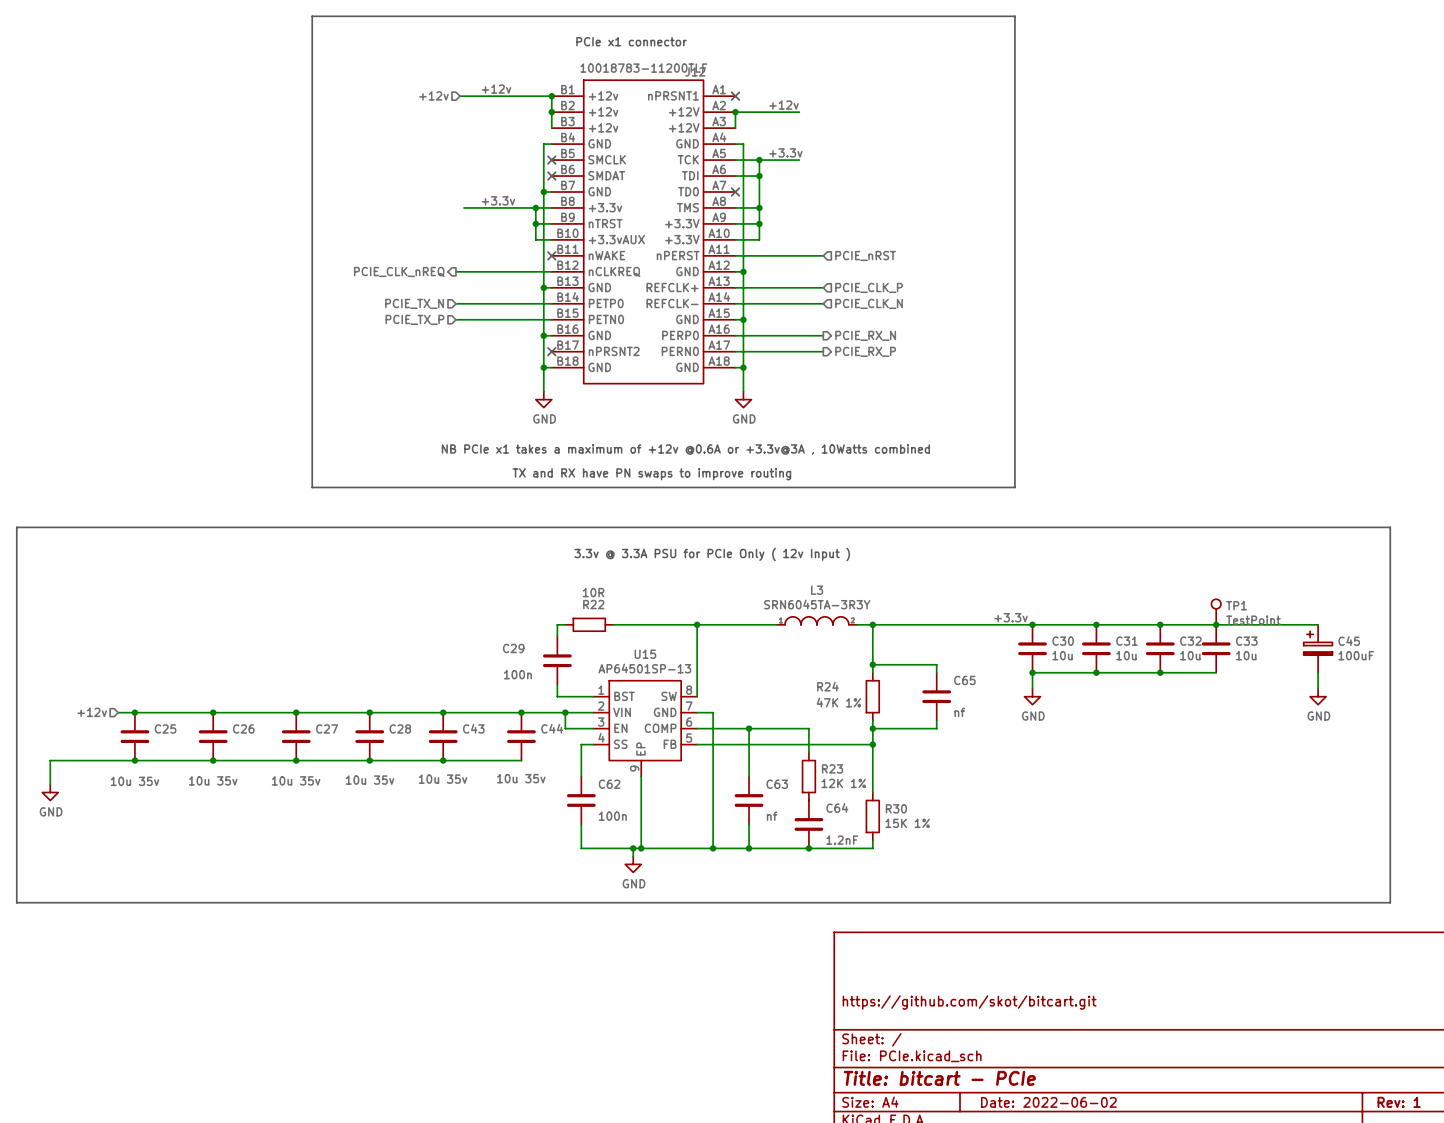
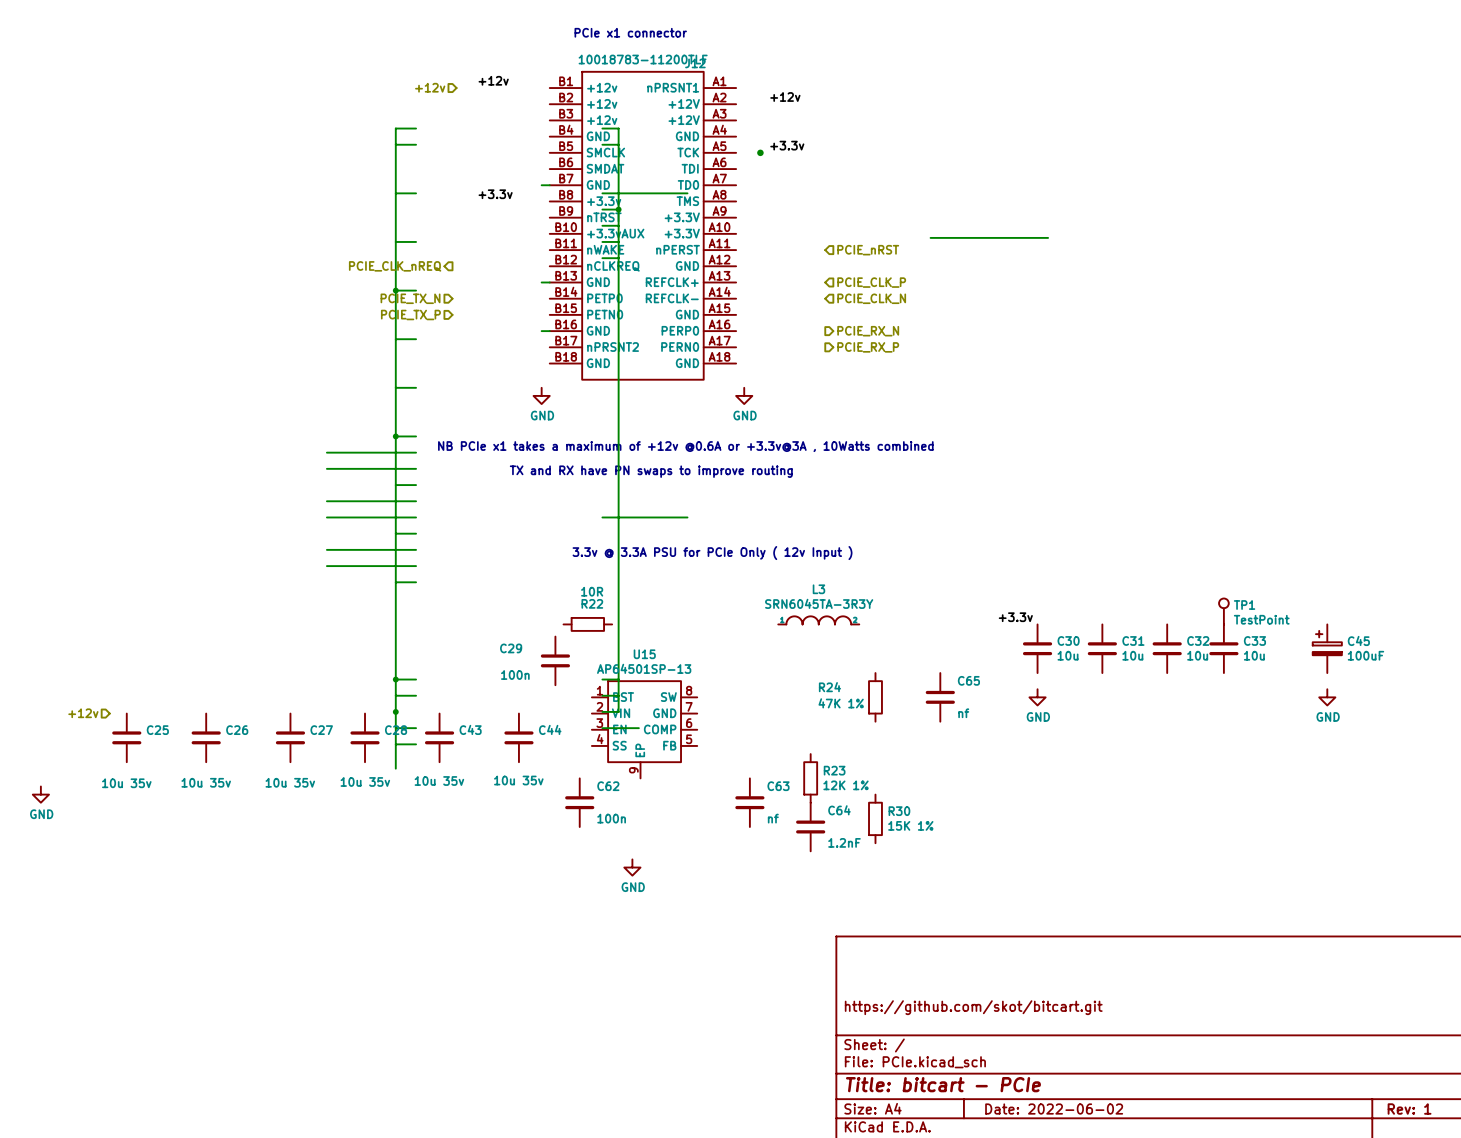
line: (312, 16) (312, 487) (1014, 487) (1014, 16) (312, 16) -> none
wire: (459, 96) (551, 96) (551, 128) -> none
junction: (551, 96) -> none
no-connect mark: (735, 96) -> none
junction: (551, 112) -> none
junction: (735, 112) -> none
wire: (799, 112) (735, 112) (735, 128) -> none
wire: none -> (416, 128) (395, 128) (395, 768)
wire: none -> (602, 128) (618, 128) (618, 711) (602, 711)
wire: (551, 144) (543, 144) (543, 391) -> none
wire: (735, 144) (743, 144) (743, 391) -> none
wire: none -> (395, 144) (416, 144)
wire: none -> (602, 144) (618, 144)
no-connect mark: (551, 160) -> none
wire: (735, 160) (799, 160) -> none
wire: (759, 160) (759, 239) (735, 239) -> none
no-connect mark: (551, 176) -> none
wire: (735, 176) (759, 176) -> none
junction: (759, 176) -> none
junction: (543, 192) -> none
no-connect mark: (735, 192) -> none
wire: none -> (395, 193) (416, 193)
wire: none -> (602, 193) (687, 193)
wire: (463, 207) (551, 207) -> none
wire: (535, 207) (535, 239) (551, 239) -> none
junction: (535, 207) -> none
wire: (735, 207) (759, 207) -> none
junction: (759, 207) -> none
junction: none -> (618, 209)
wire: (535, 223) (551, 223) -> (602, 209) (618, 209)
junction: (535, 223) -> none
wire: (735, 223) (759, 223) -> none
junction: (759, 223) -> none
wire: none -> (602, 225) (618, 225)
wire: none -> (930, 237) (1048, 237)
wire: none -> (395, 241) (416, 241)
wire: none -> (602, 241) (618, 241)
no-connect mark: (551, 255) -> none
wire: (735, 255) (823, 255) -> none
wire: none -> (602, 258) (618, 258)
wire: (455, 271) (551, 271) -> none
wire: (735, 271) (743, 271) -> none
junction: (743, 271) -> none
junction: (543, 287) -> none
wire: (735, 287) (823, 287) -> none
wire: none -> (395, 290) (416, 290)
junction: none -> (395, 290)
wire: (455, 303) (551, 303) -> none
wire: (735, 303) (823, 303) -> none
wire: (455, 319) (551, 319) -> none
wire: (735, 319) (743, 319) -> none
junction: (743, 319) -> none
junction: (543, 335) -> none
wire: (735, 335) (823, 335) -> none
wire: none -> (395, 339) (416, 339)
no-connect mark: (551, 351) -> none
wire: (735, 351) (823, 351) -> none
wire: (543, 367) (551, 367) -> none
junction: (543, 367) -> none
wire: (735, 367) (743, 367) -> none
junction: (743, 367) -> none
wire: none -> (395, 387) (416, 387)
wire: none -> (395, 436) (416, 436)
junction: none -> (395, 436)
wire: none -> (326, 452) (416, 452)
wire: none -> (326, 468) (416, 468)
wire: none -> (326, 501) (416, 501)
wire: none -> (326, 517) (416, 517)
wire: none -> (602, 517) (687, 517)
line: (16, 527) (1390, 527) (1390, 902) (16, 902) (16, 527) -> none
wire: none -> (395, 533) (416, 533)
wire: none -> (326, 549) (416, 549)
wire: none -> (326, 566) (416, 566)
wire: none -> (395, 582) (416, 582)
wire: (565, 624) (557, 624) (557, 636) -> none
wire: (613, 624) (776, 624) -> none
wire: (697, 624) (697, 696) -> none
junction: (697, 624) -> none
wire: (856, 624) (1318, 624) -> none
wire: (872, 624) (872, 672) -> none
junction: (872, 624) -> none
junction: (1032, 624) -> none
junction: (1096, 624) -> none
junction: (1160, 624) -> none
junction: (1216, 624) -> none
wire: (872, 664) (936, 664) (936, 672) -> none
junction: (872, 664) -> none
junction: (1032, 672) -> none
junction: (1096, 672) -> none
junction: (1160, 672) -> none
wire: (1216, 672) (1032, 672) (1032, 688) -> none
wire: (1318, 672) (1318, 688) -> none
wire: none -> (395, 679) (416, 679)
junction: none -> (395, 679)
wire: none -> (602, 679) (618, 679)
wire: (557, 684) (557, 696) (593, 696) -> none
wire: none -> (395, 695) (416, 695)
wire: none -> (602, 695) (618, 695)
junction: none -> (395, 711)
wire: (118, 712) (593, 712) -> none
junction: (134, 712) -> none
junction: (213, 712) -> none
junction: (296, 712) -> none
junction: (369, 712) -> none
junction: (443, 712) -> none
junction: (521, 712) -> none
wire: (565, 712) (565, 728) (593, 728) -> none
junction: (565, 712) -> none
wire: (697, 712) (713, 712) (713, 848) -> none
wire: (872, 720) (872, 792) -> none
wire: (936, 720) (936, 728) (872, 728) -> none
wire: none -> (395, 728) (416, 728)
wire: none -> (602, 728) (638, 728)
wire: (697, 728) (808, 728) (808, 752) -> none
wire: (749, 728) (749, 776) -> none
junction: (749, 728) -> none
junction: (872, 728) -> none
wire: none -> (395, 744) (416, 744)
wire: (593, 744) (581, 744) (581, 776) -> none
wire: (697, 744) (872, 744) -> none
junction: (872, 744) -> none
junction: (134, 760) -> none
junction: (213, 760) -> none
junction: (296, 760) -> none
junction: (369, 760) -> none
junction: (443, 760) -> none
wire: (521, 760) (50, 760) (50, 784) -> none
wire: (641, 776) (641, 848) -> none
wire: (581, 824) (581, 848) (872, 848) (872, 840) -> none
wire: (749, 824) (749, 848) -> none
wire: (633, 848) (633, 856) -> none
junction: (633, 848) -> none
junction: (641, 848) -> none
junction: (713, 848) -> none
junction: (749, 848) -> none
junction: (808, 848) -> none

